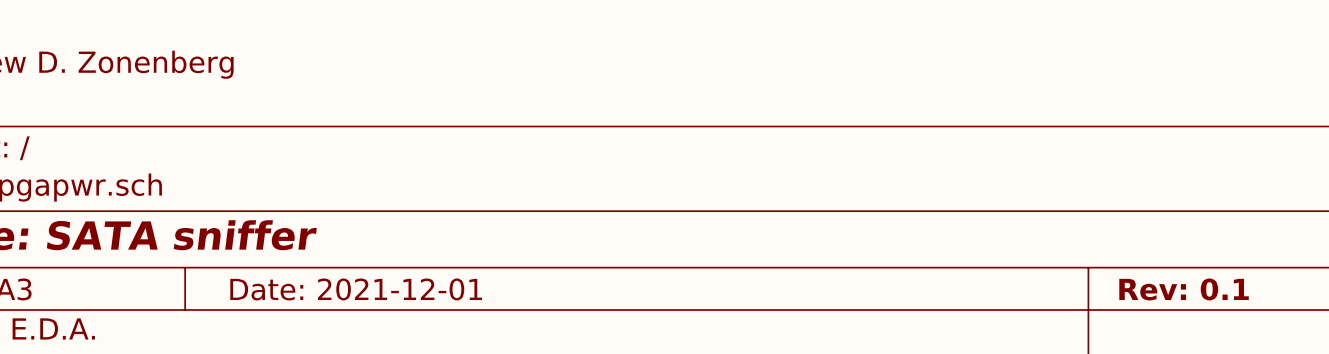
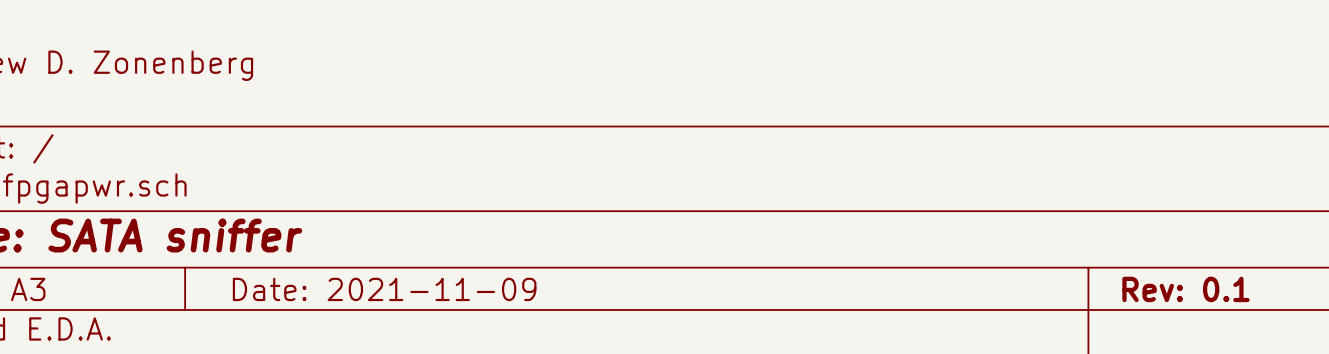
title block: Date: 2021-12-01 (356, 289) -> Date: 2021-11-09 (384, 289)

